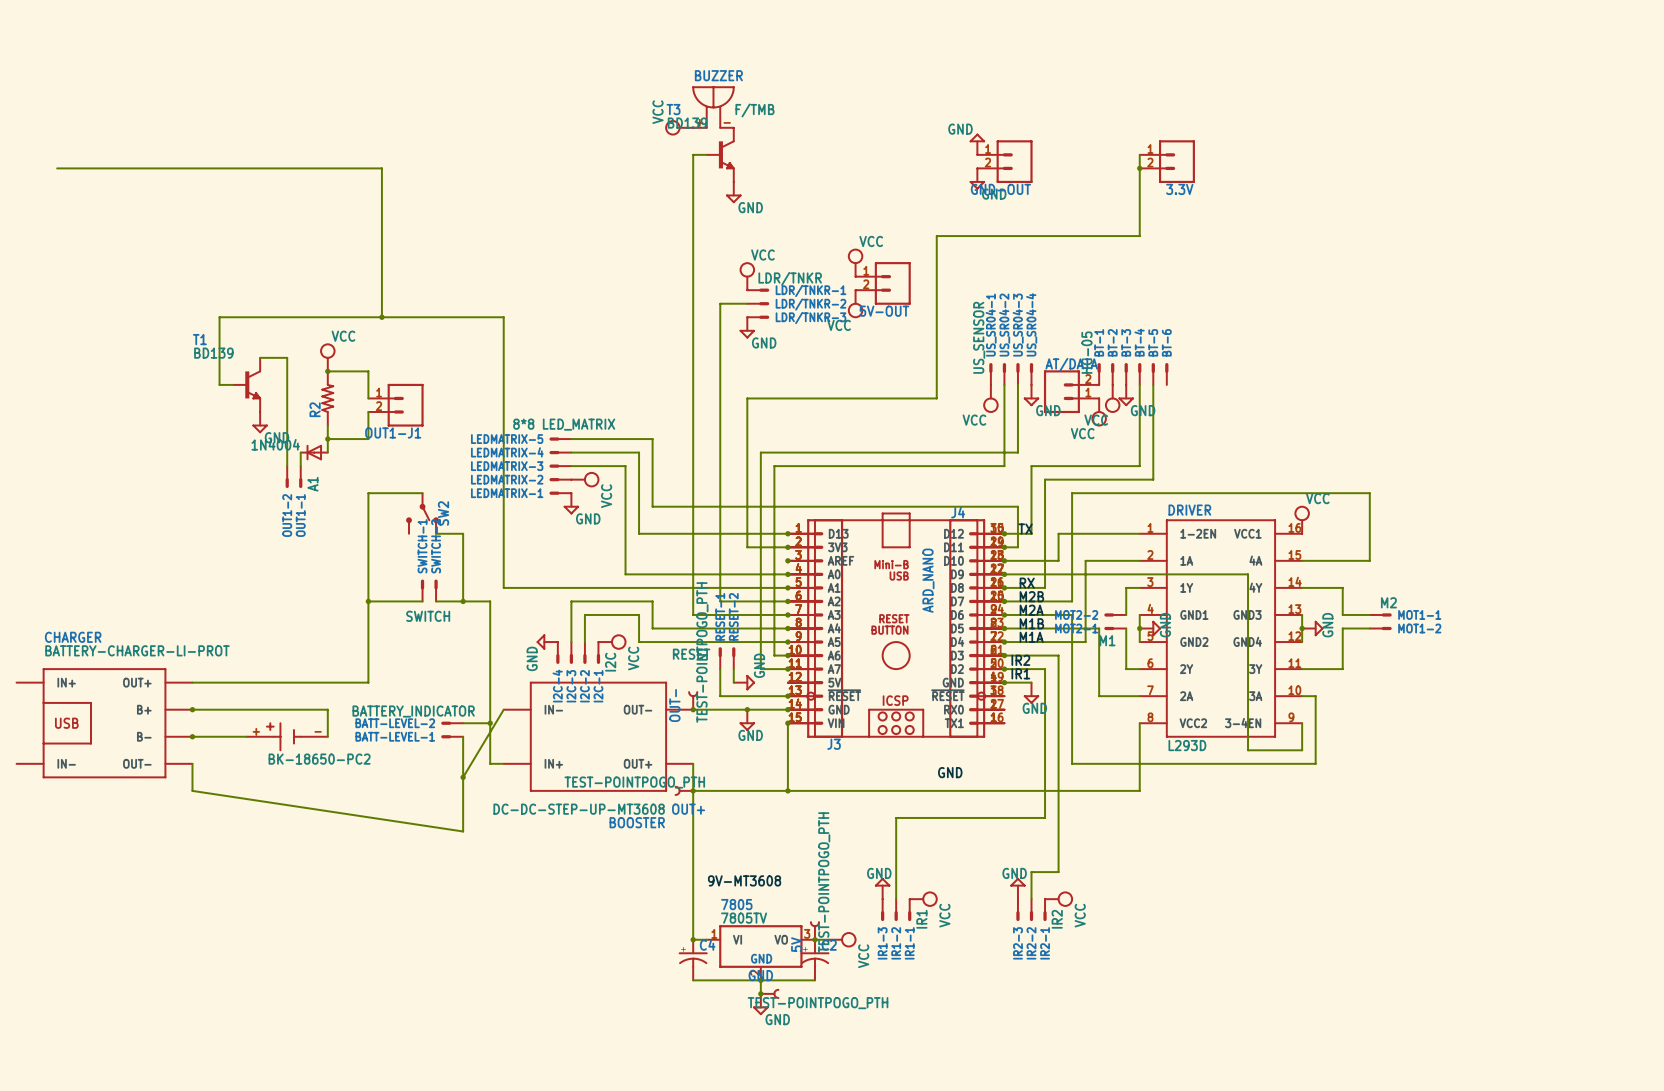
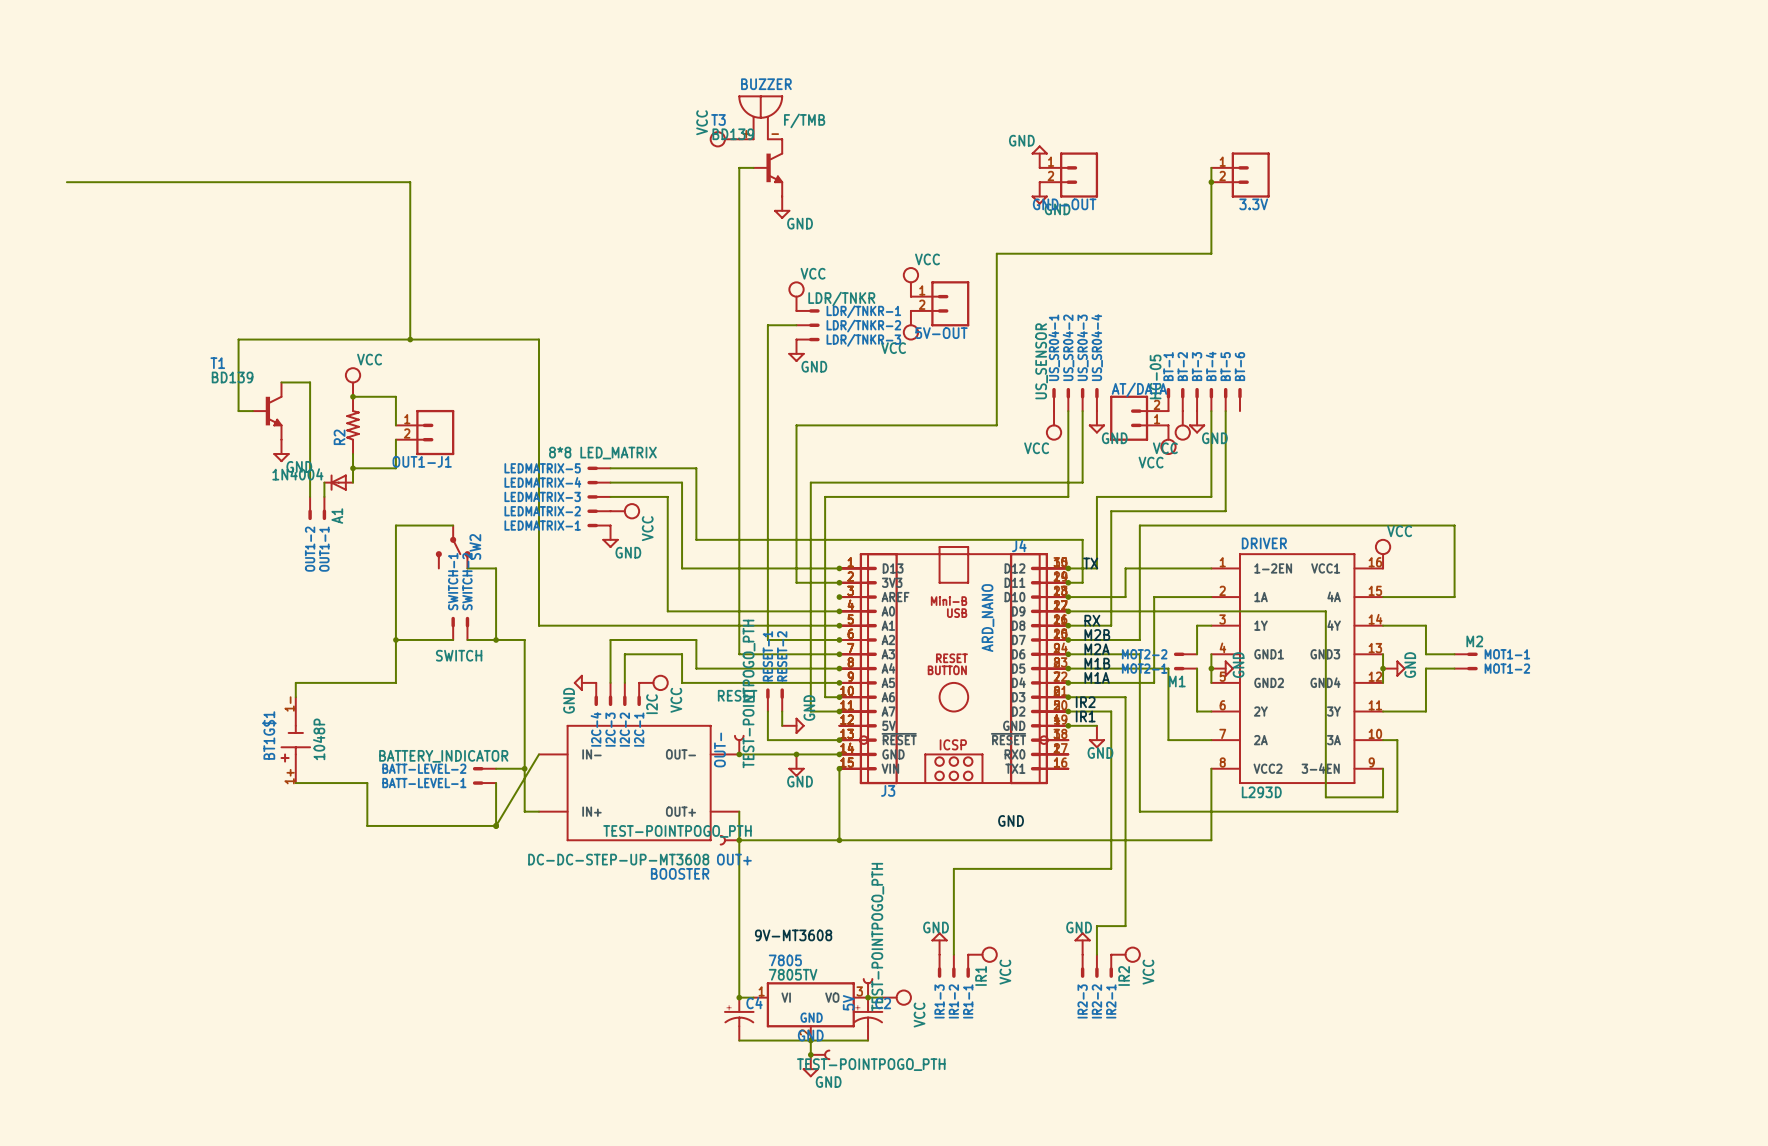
wire: (368, 642) (368, 682) (192, 682) -> (395, 682) (295, 682) (295, 697)
BT1G$1: none -> 1048P (295, 740)
wire: (192, 709) (327, 709) (327, 736) -> none
junction: (192, 709) -> none
CHARGER: BATTERY-CHARGER-LI-PROT (104, 723) -> none
wire: (192, 736) (246, 736) -> none
junction: (192, 736) -> none
part: BK-18650-PC2 (287, 736) -> none
wire: (192, 763) (192, 790) (463, 831) (463, 777) -> (295, 783) (367, 783) (367, 825) (496, 825)

